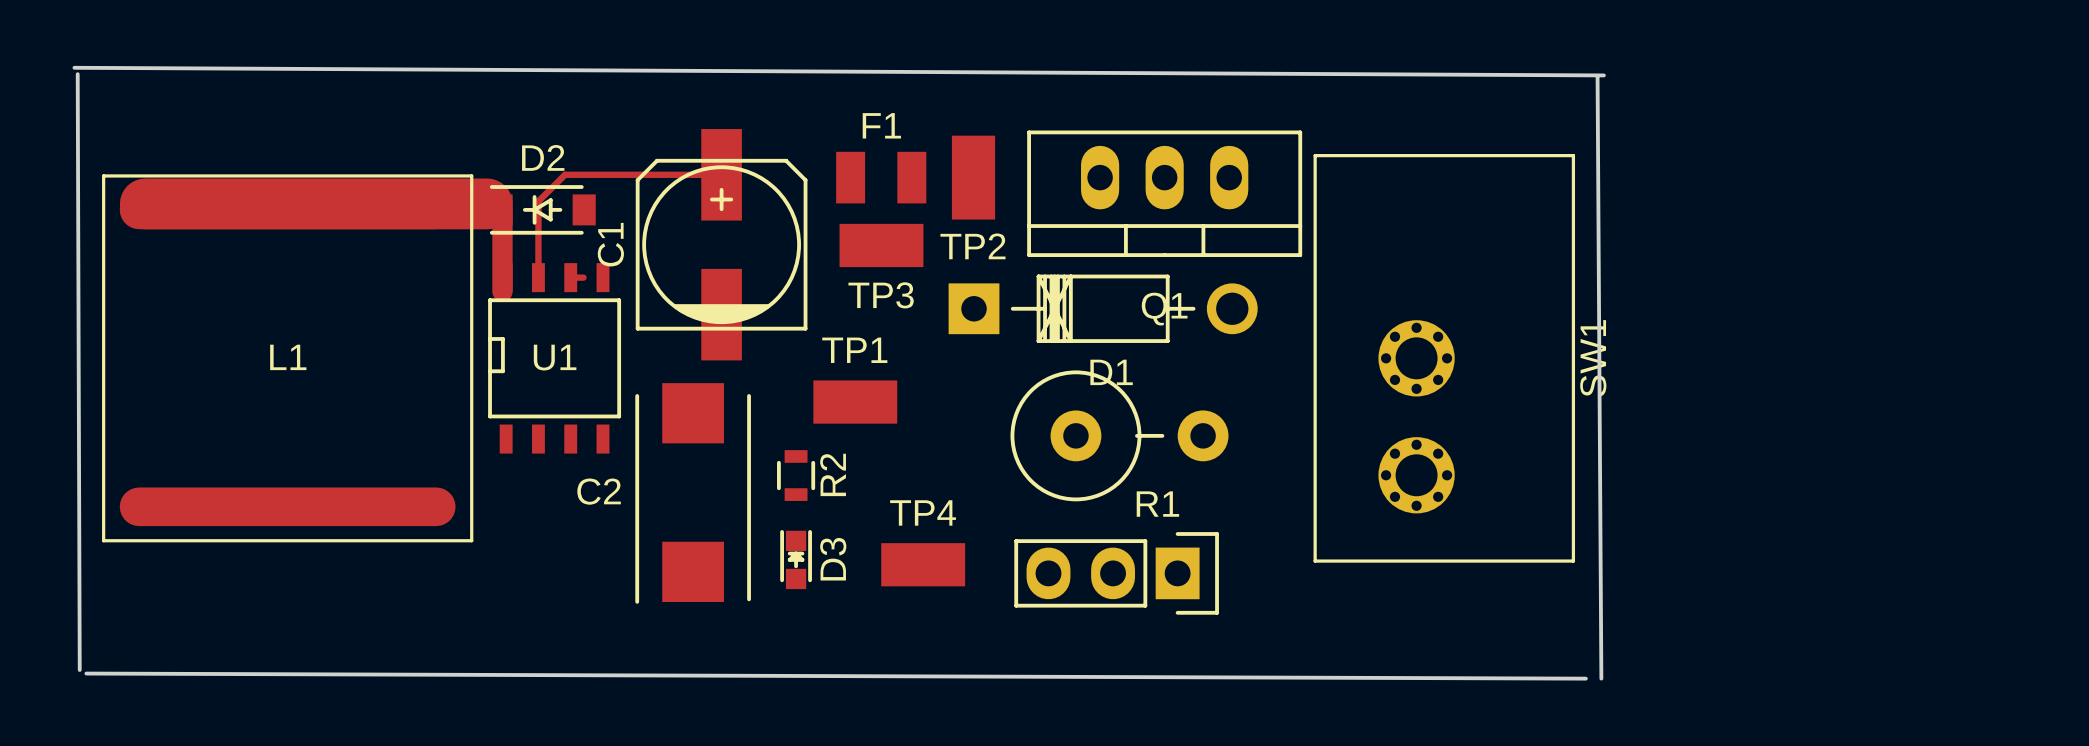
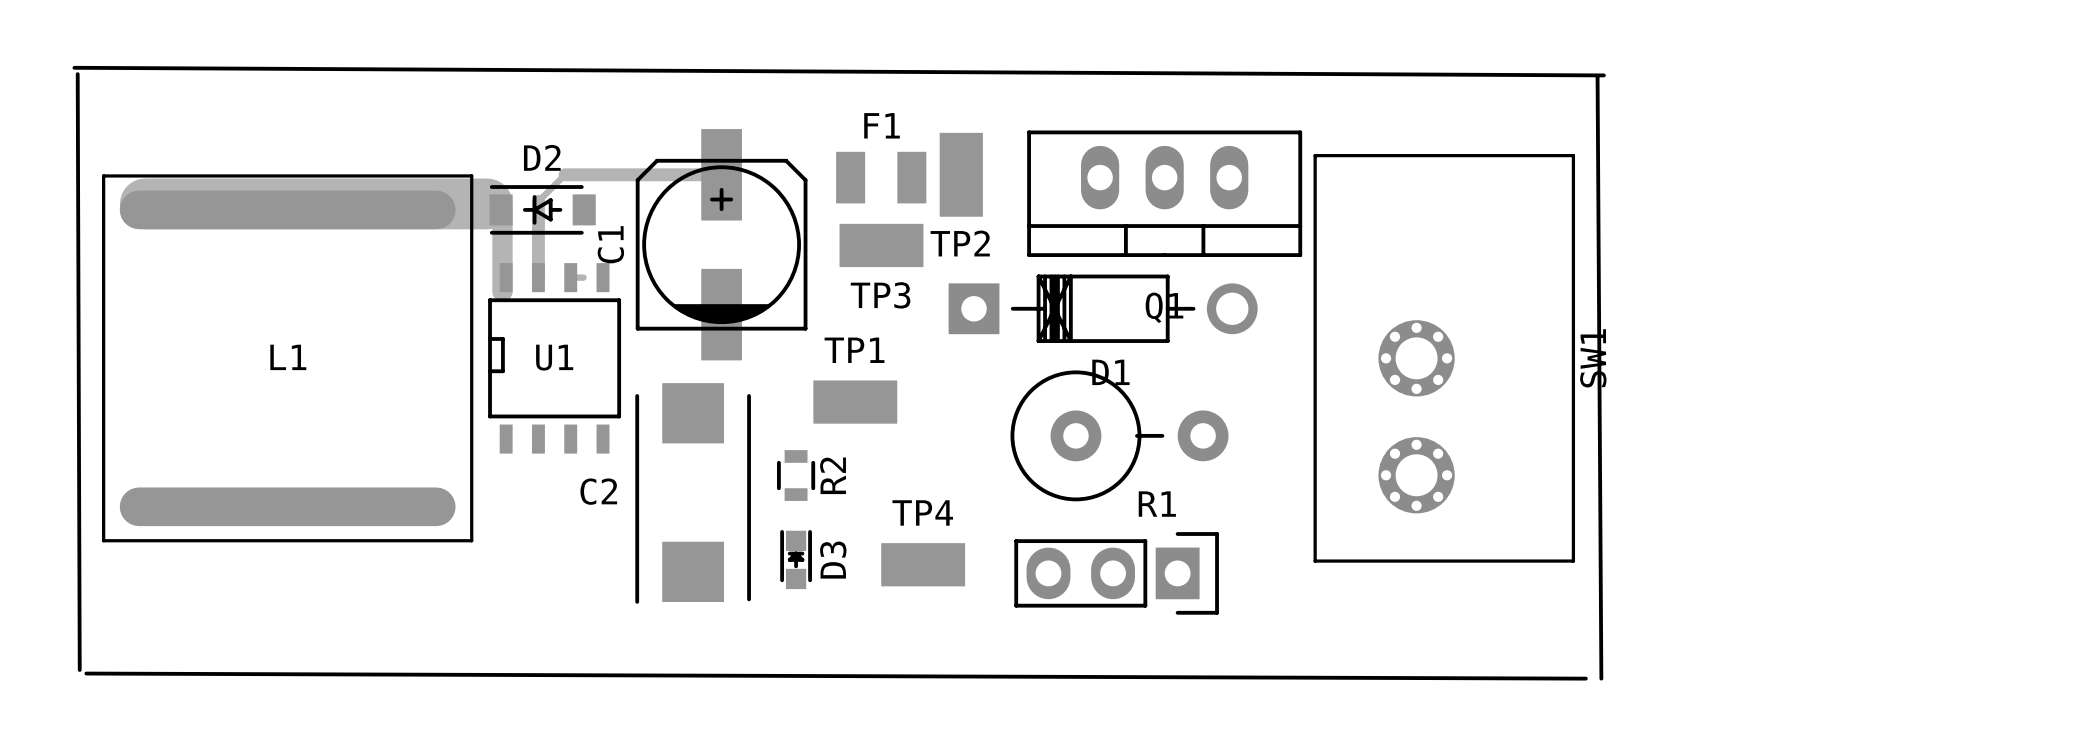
track width: thin (565, 174) (721, 174) -> thick (565, 174) (721, 174)
TP2 position: (973, 177) -> (961, 174)
track width: thin (538, 201) (538, 277) -> thick (538, 201) (538, 277)

